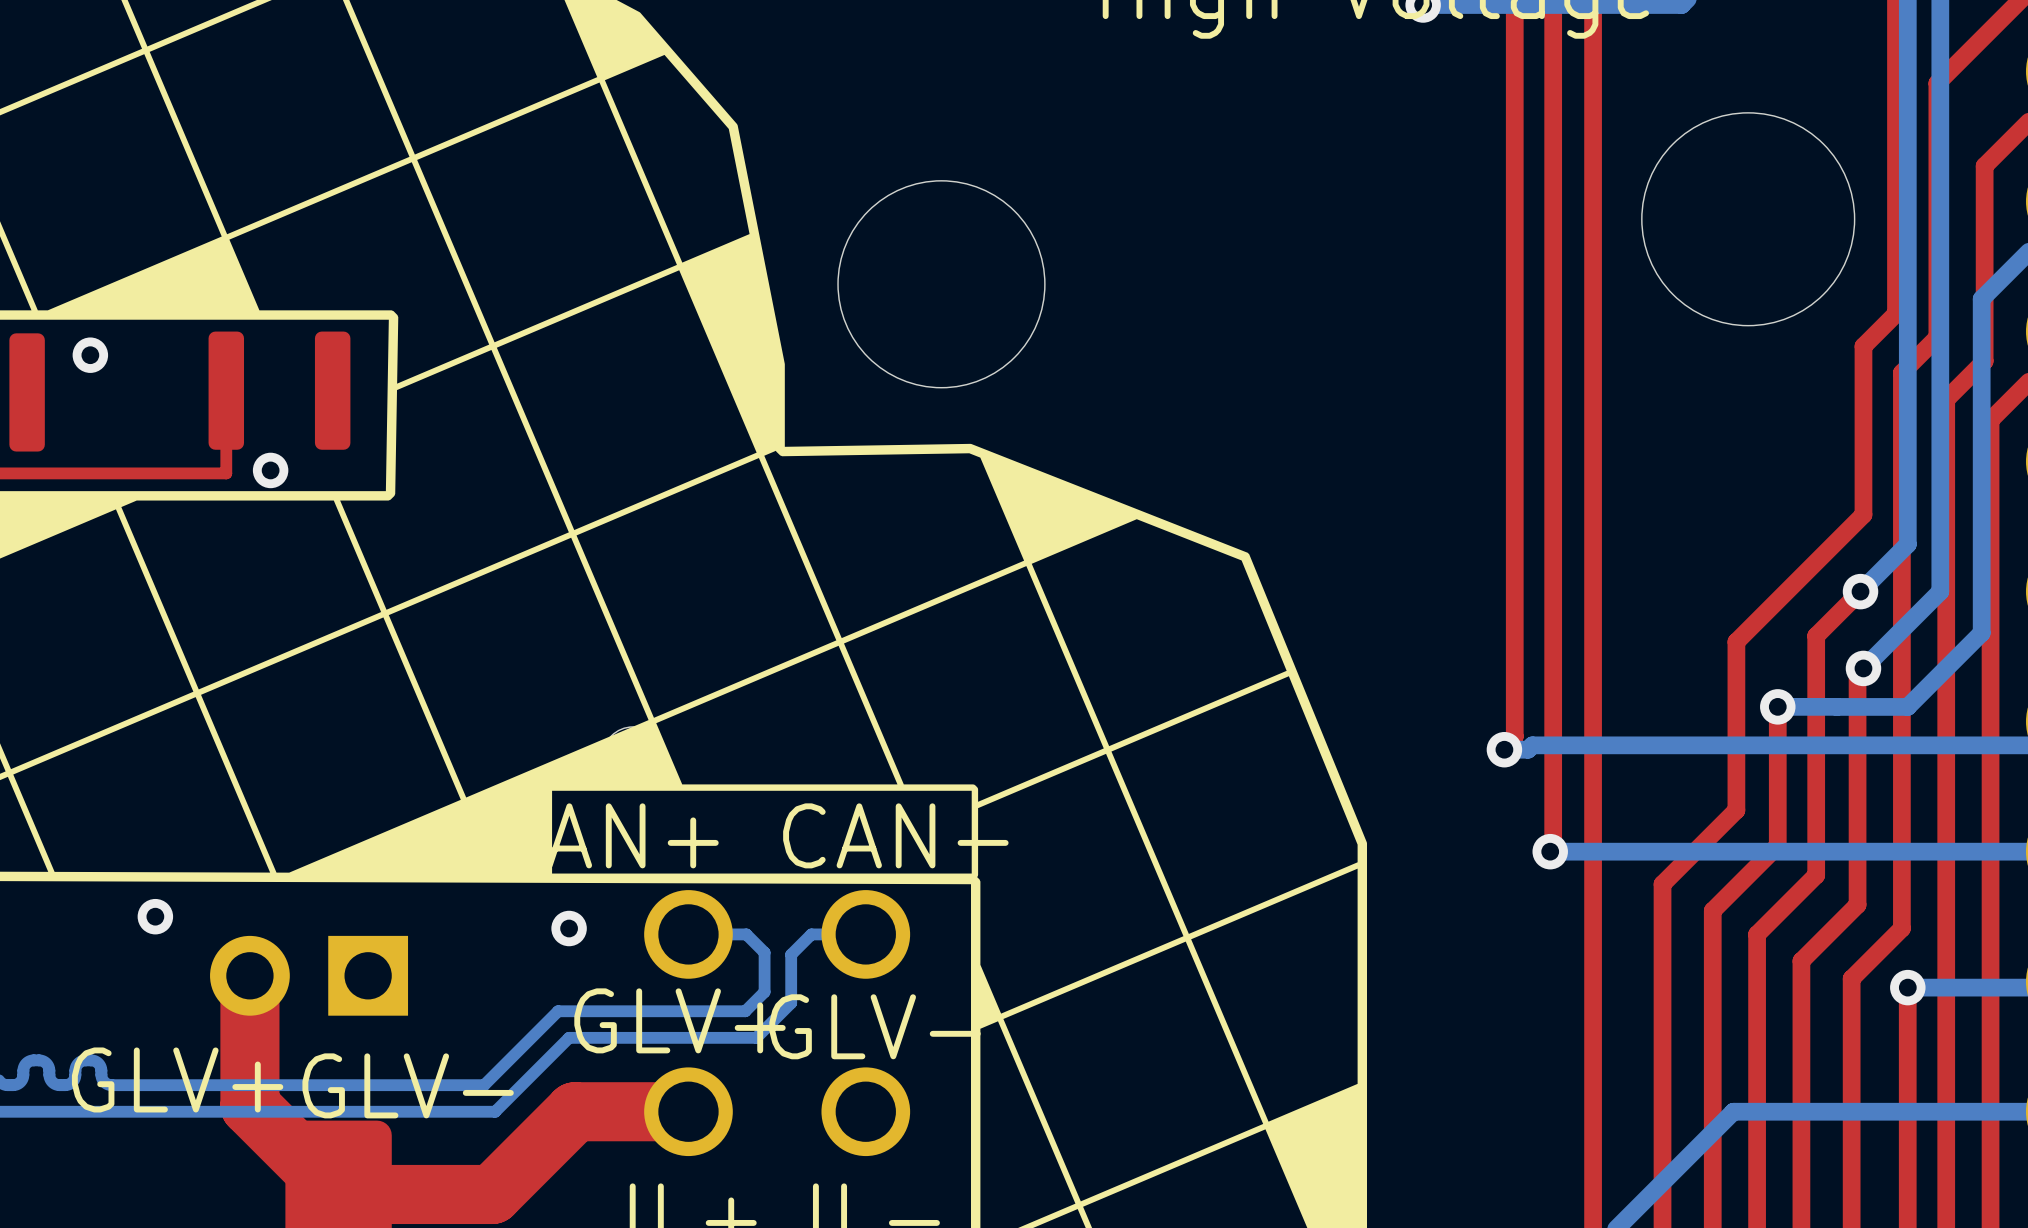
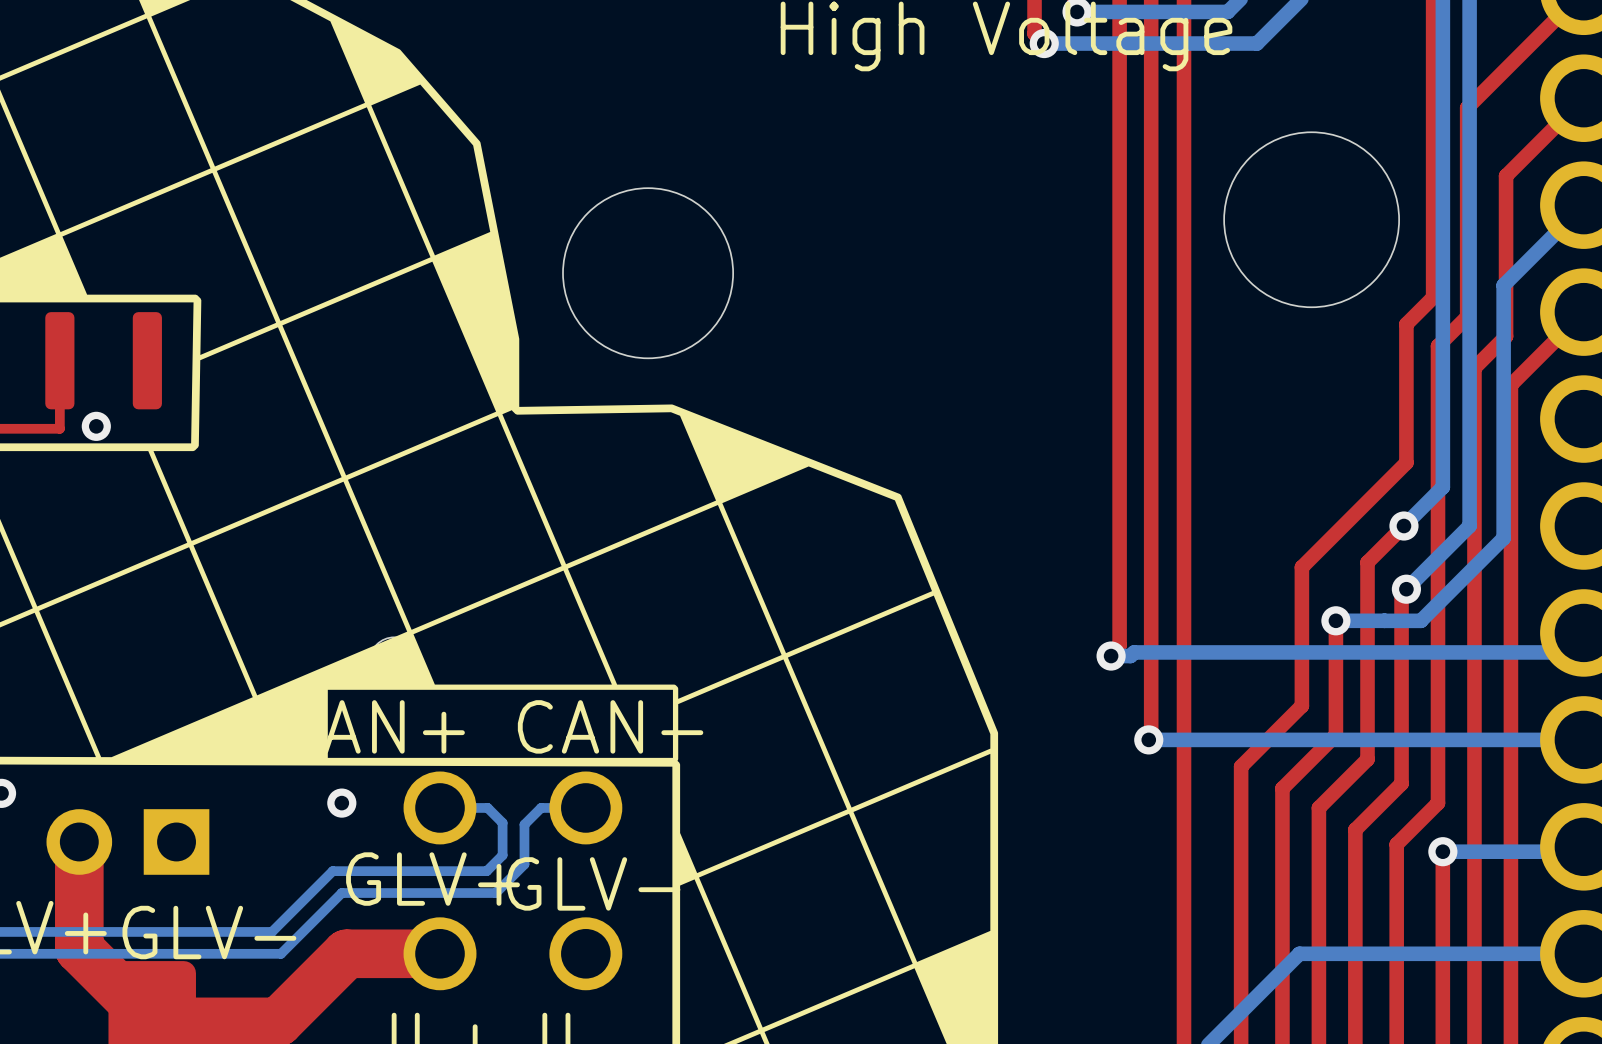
bottom track: (1981, 606) (1981, 632) (1907, 706) (1881, 706) -> (1503, 538) (1420, 620)

